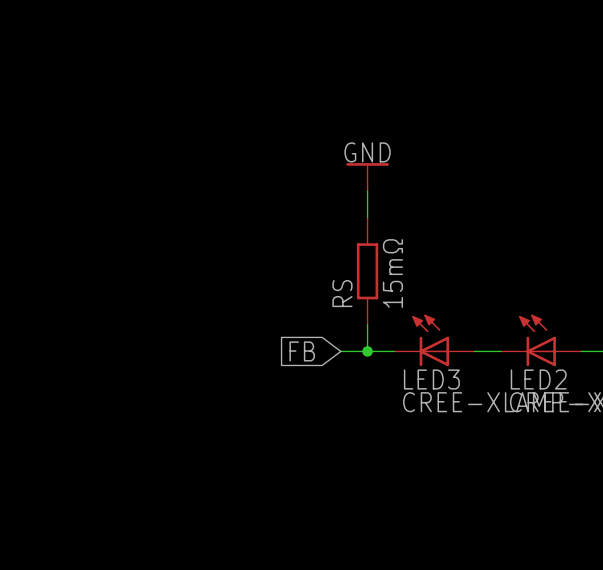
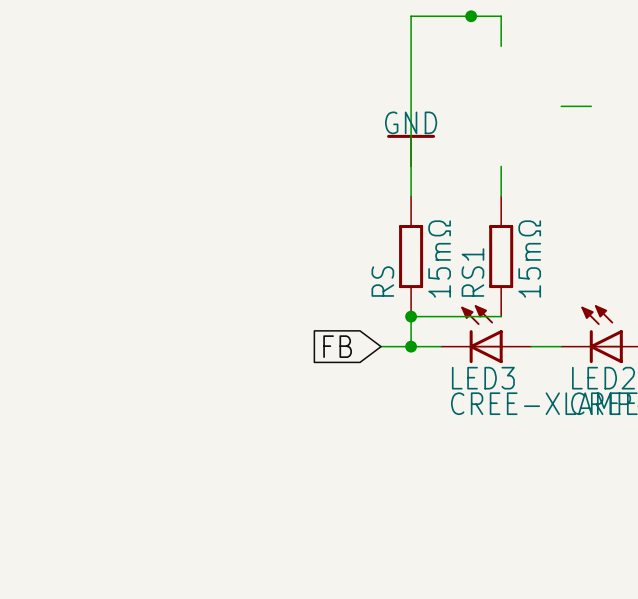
junction: none -> (471, 16)
wire: none -> (501, 46) (501, 16) (411, 16) (411, 166)
wire: none -> (561, 106) (591, 106)
wire: none -> (501, 166) (501, 196)
RS1: none -> 15mΩ (501, 256)
wire: none -> (411, 316) (501, 316)
junction: none -> (411, 316)

